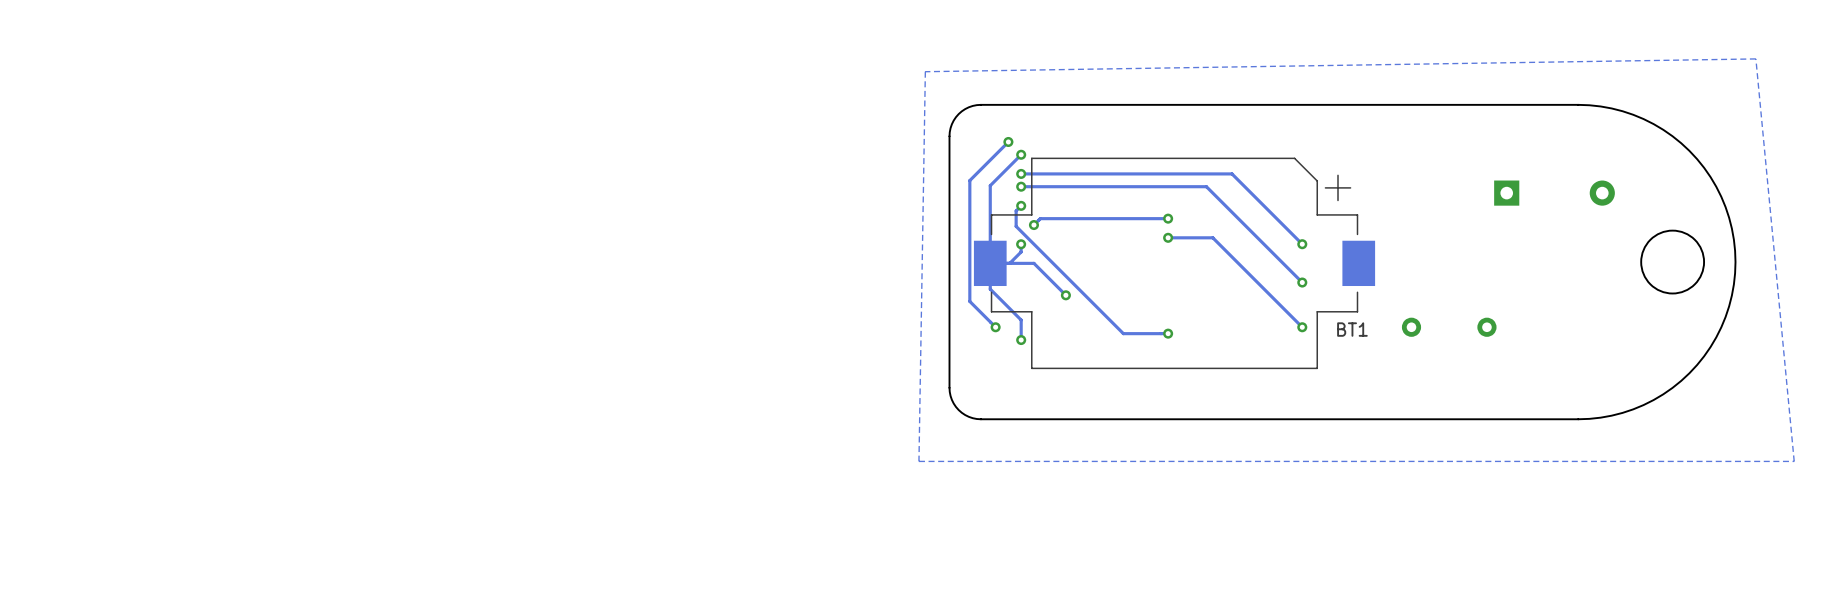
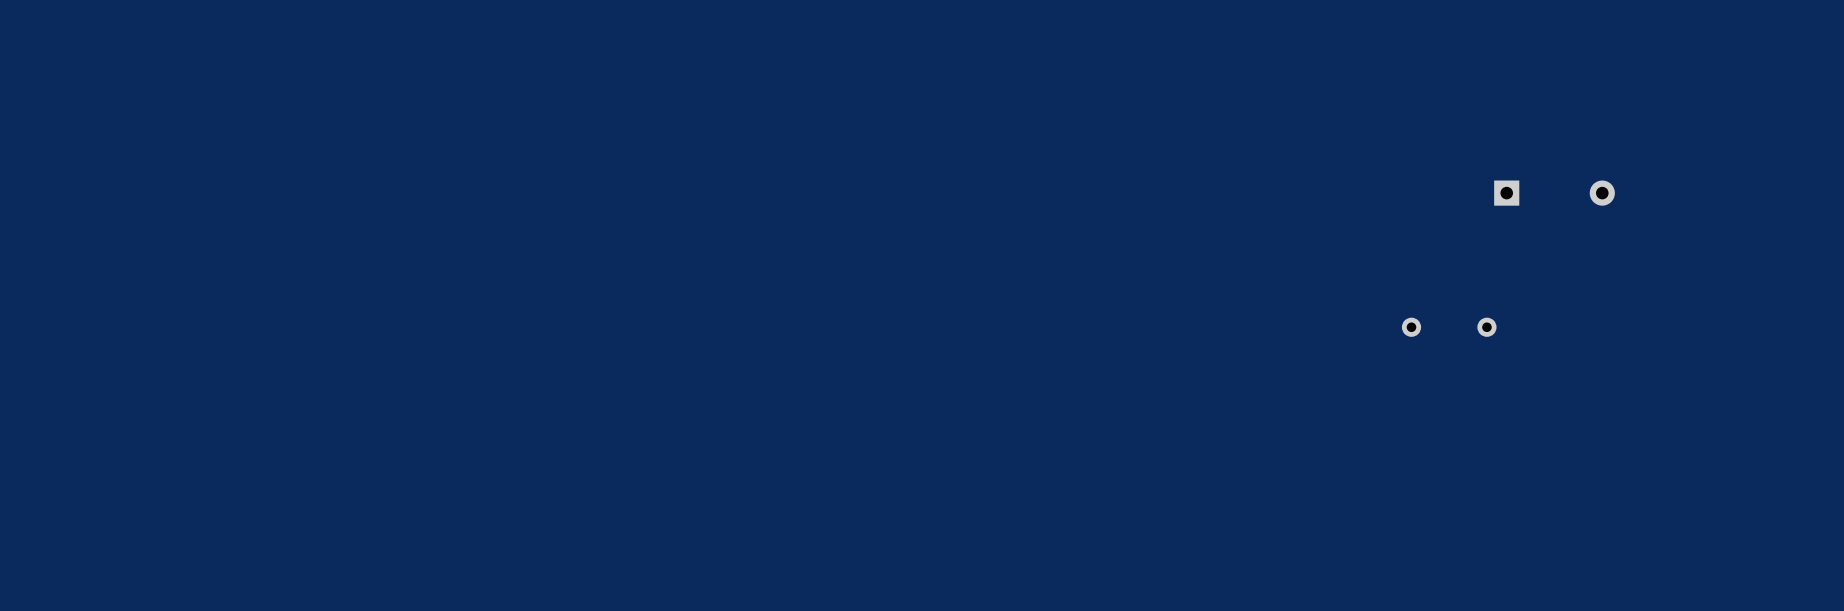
zone outline: (1755, 58) (1794, 461) (918, 461) (925, 71) (1755, 58) -> none
board edge: (1578, 104) (980, 104) (968, 107) (955, 117) (950, 128) (949, 136) (949, 387) (951, 399) (961, 412) (972, 418) (980, 419) (1578, 419) (1611, 415) (1643, 405) (1672, 387) (1689, 373) (1704, 356) (1721, 327) (1729, 306) (1733, 284) (1735, 250) (1731, 228) (1725, 207) (1716, 186) (1697, 159) (1681, 143) (1653, 124) (1633, 114) (1600, 106) (1578, 104) -> none
track: (1008, 141) (969, 180) (969, 301) (995, 327) -> none
via: (1008, 141) -> none
track: (1021, 154) (990, 185) (990, 289) (1021, 320) (1021, 340) -> none
via: (1021, 154) -> none
track: (1021, 173) (1232, 173) (1302, 244) -> none
via: (1021, 173) -> none
track: (1021, 186) (1206, 186) (1302, 282) -> none
via: (1021, 186) -> none
track: (1021, 205) (1016, 210) (1016, 226) (1123, 333) (1168, 333) -> none
via: (1021, 205) -> none
track: (1168, 218) (1040, 218) (1033, 225) -> none
via: (1168, 218) -> none
via: (1033, 225) -> none
round board edge: [1640, 229, 1706, 295] -> none
track: (1168, 237) (1212, 237) (1302, 327) -> none
via: (1168, 237) -> none
track: (1021, 244) (1021, 252) (1009, 263) -> none
via: (1021, 244) -> none
via: (1302, 244) -> none
track: (990, 263) (1033, 263) (1065, 295) -> none
BT1: (1174, 263) -> none
via: (1302, 282) -> none
via: (1065, 295) -> none
via: (995, 327) -> none
via: (1302, 327) -> none
via: (1168, 333) -> none
via: (1021, 340) -> none

